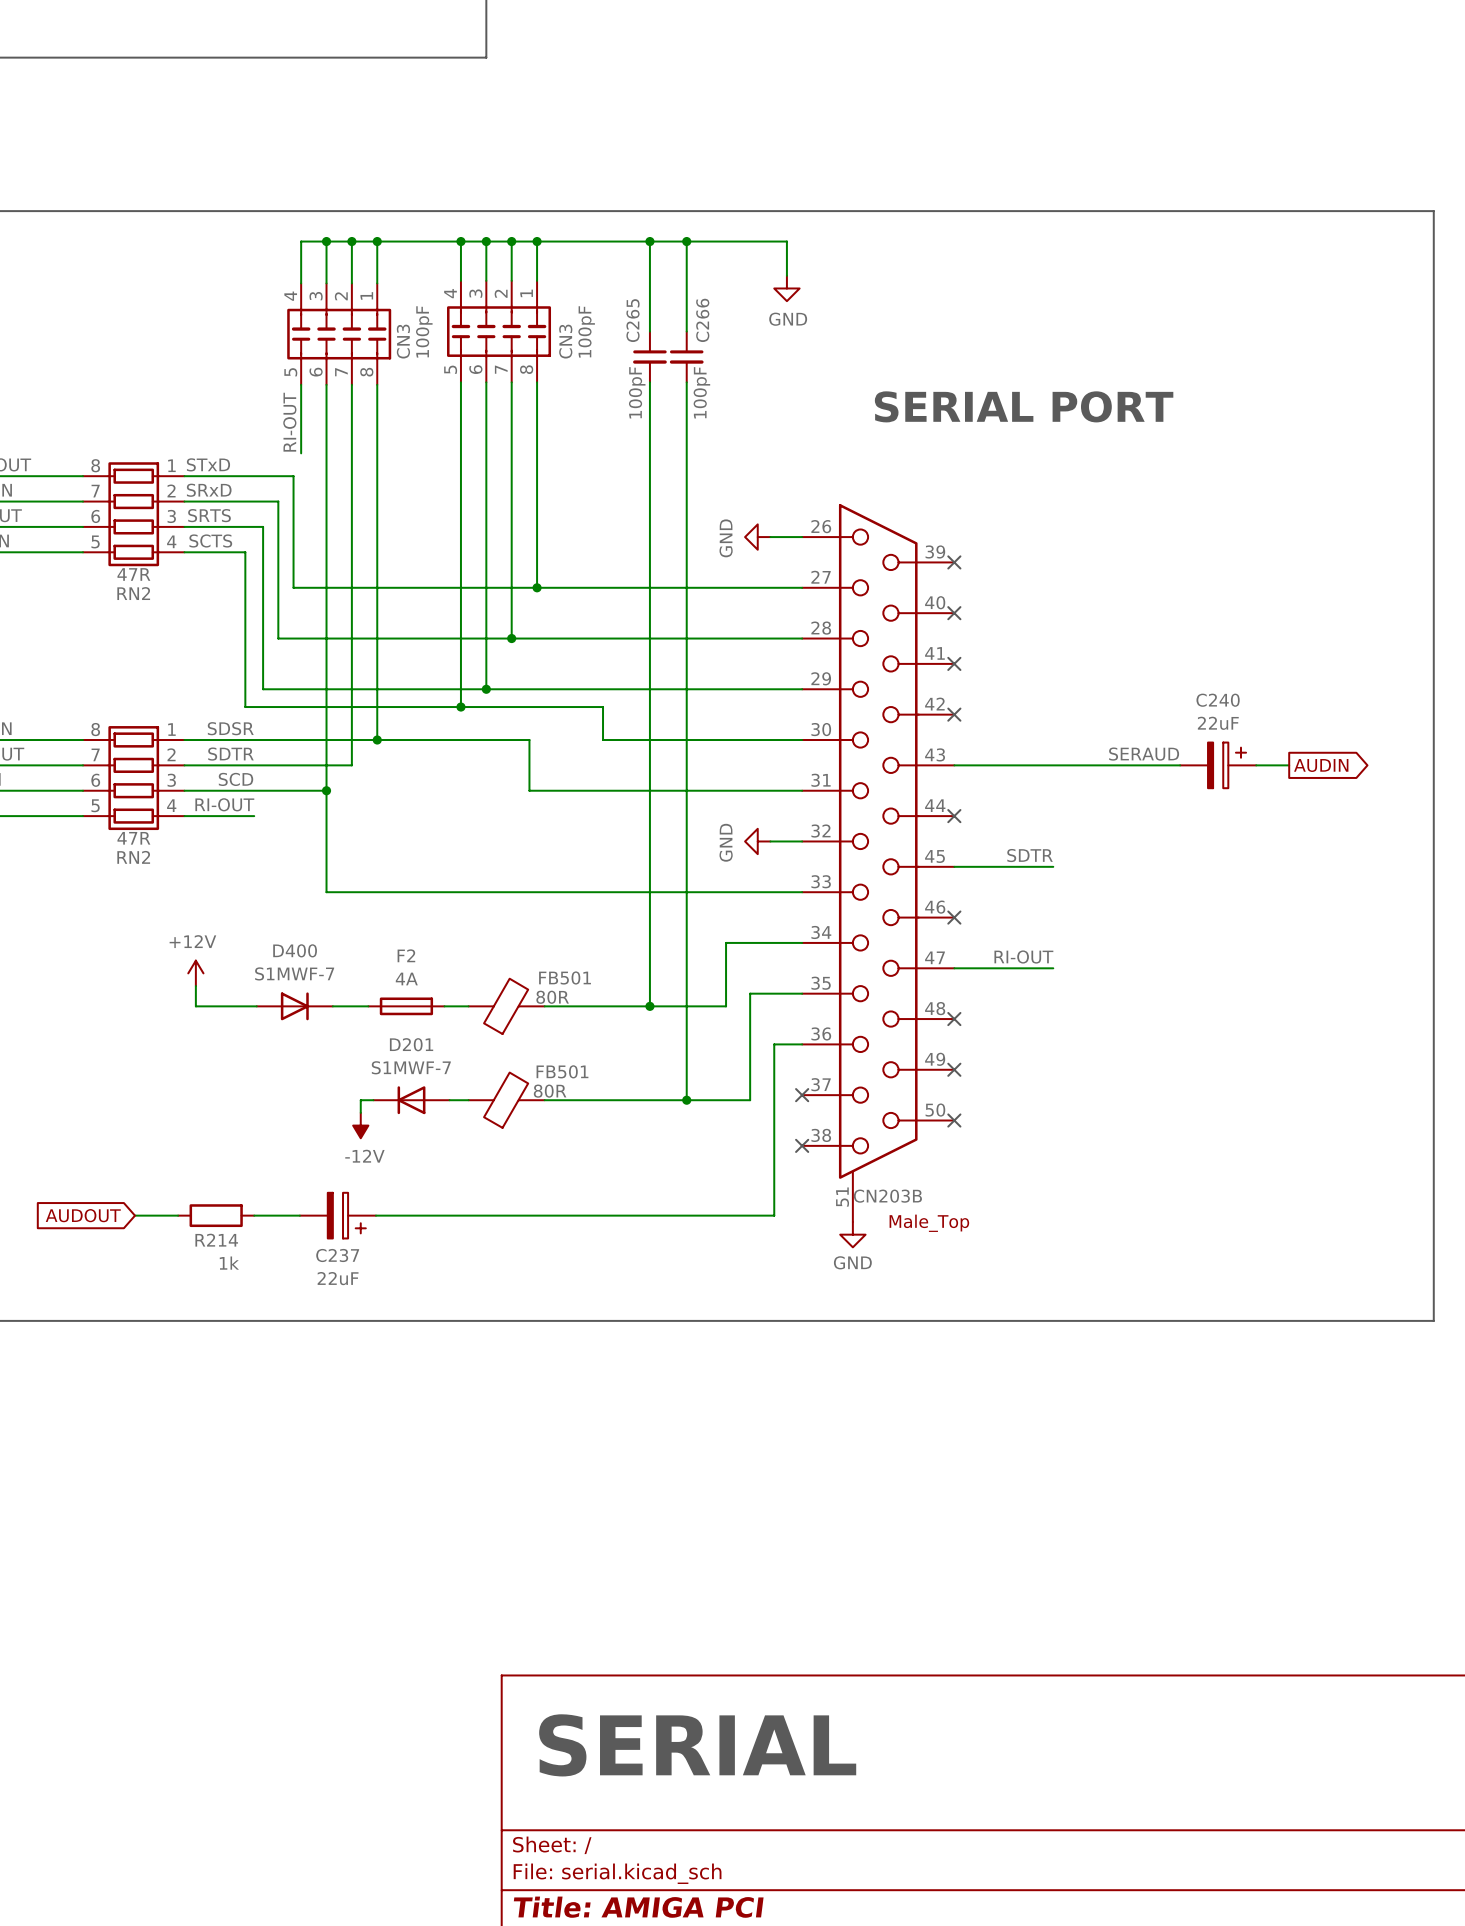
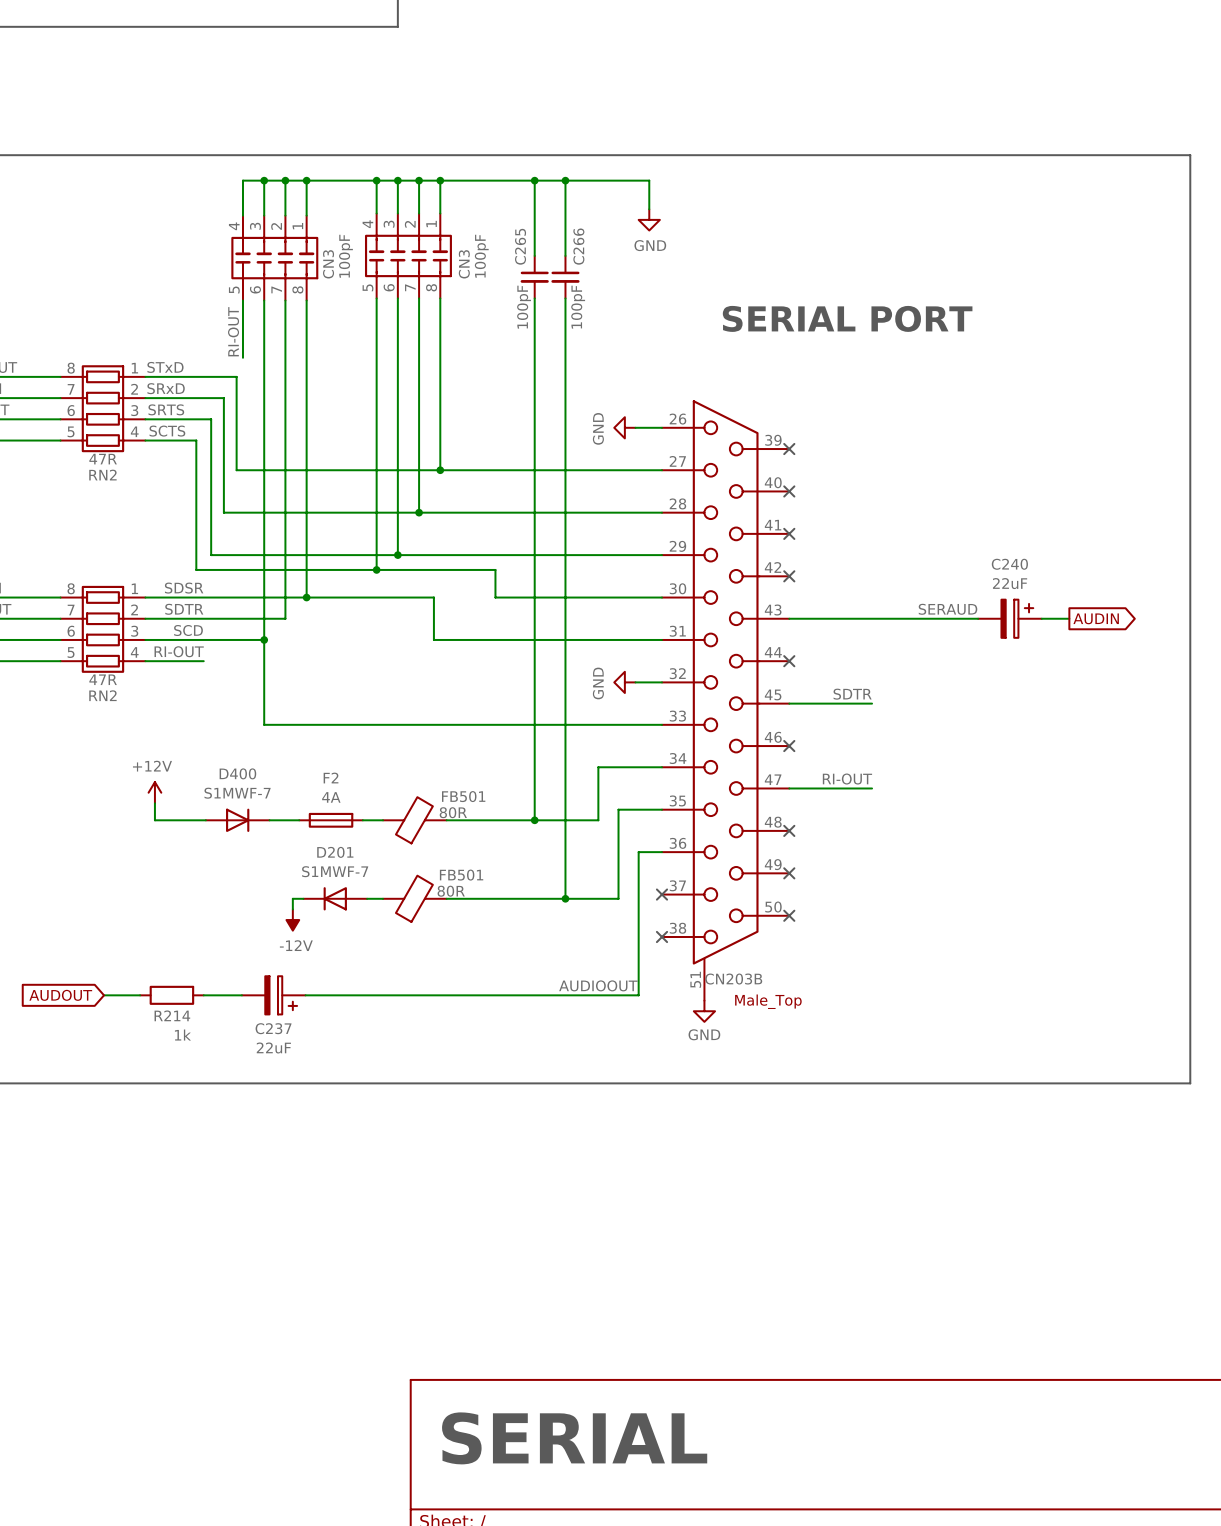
label: none -> AUDIOOUT (598, 985)

